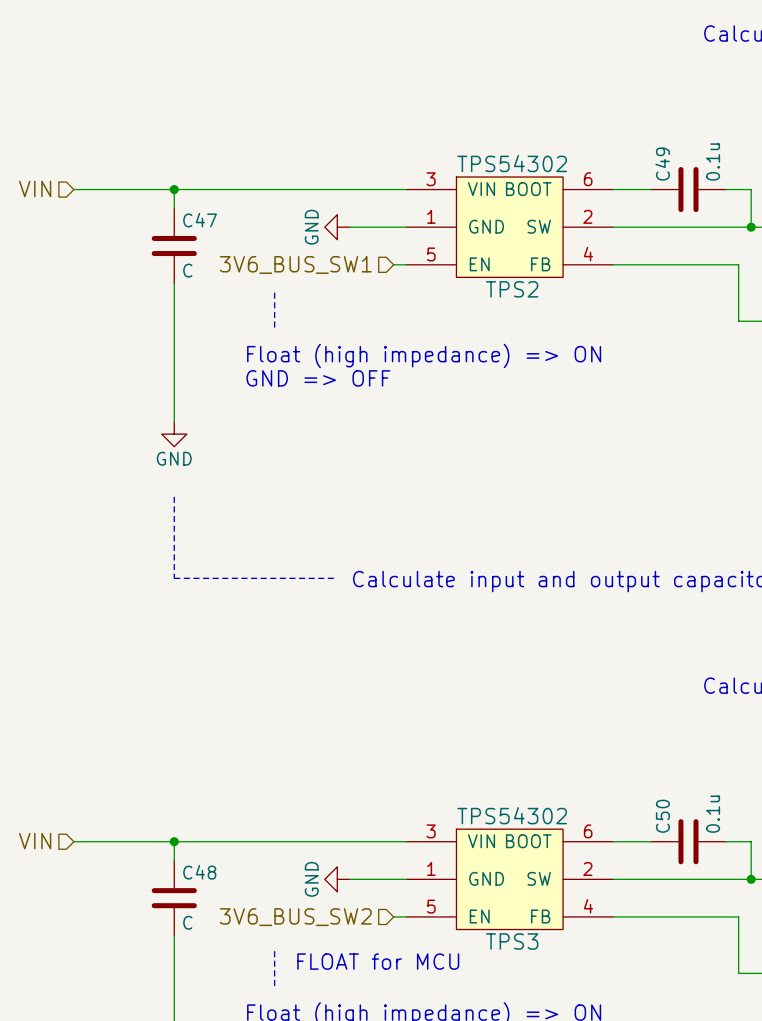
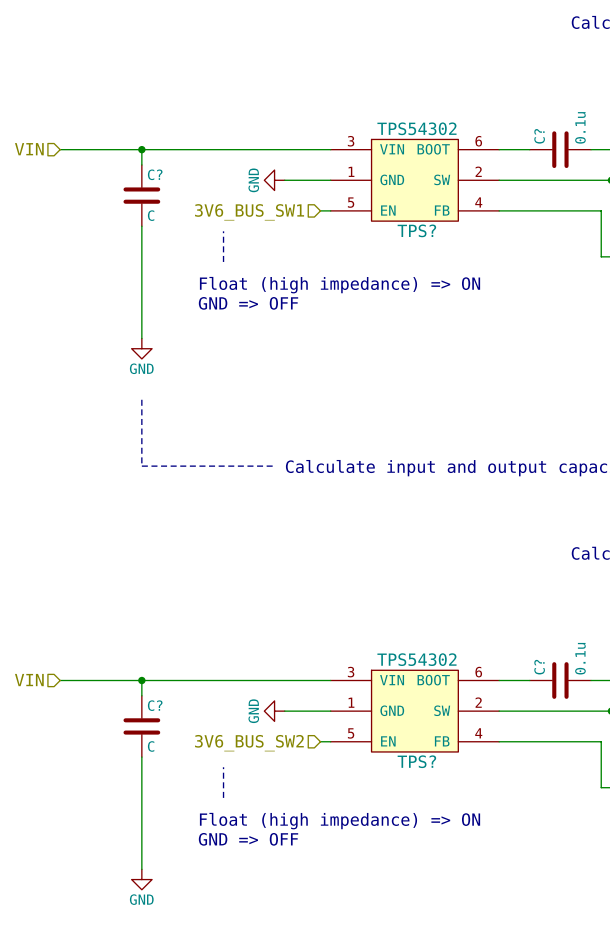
C49 name: C49 (662, 164) -> C? (539, 136)
C47 name: C47 (200, 220) -> C? (155, 174)
TPS2 name: TPS2 (512, 289) -> TPS? (416, 230)
C50 name: C50 (662, 816) -> C? (539, 667)
C48 name: C48 (199, 872) -> C? (155, 705)
TPS3 name: TPS3 (512, 941) -> TPS? (416, 761)
text: FLOAT for MCU (378, 961) -> none

